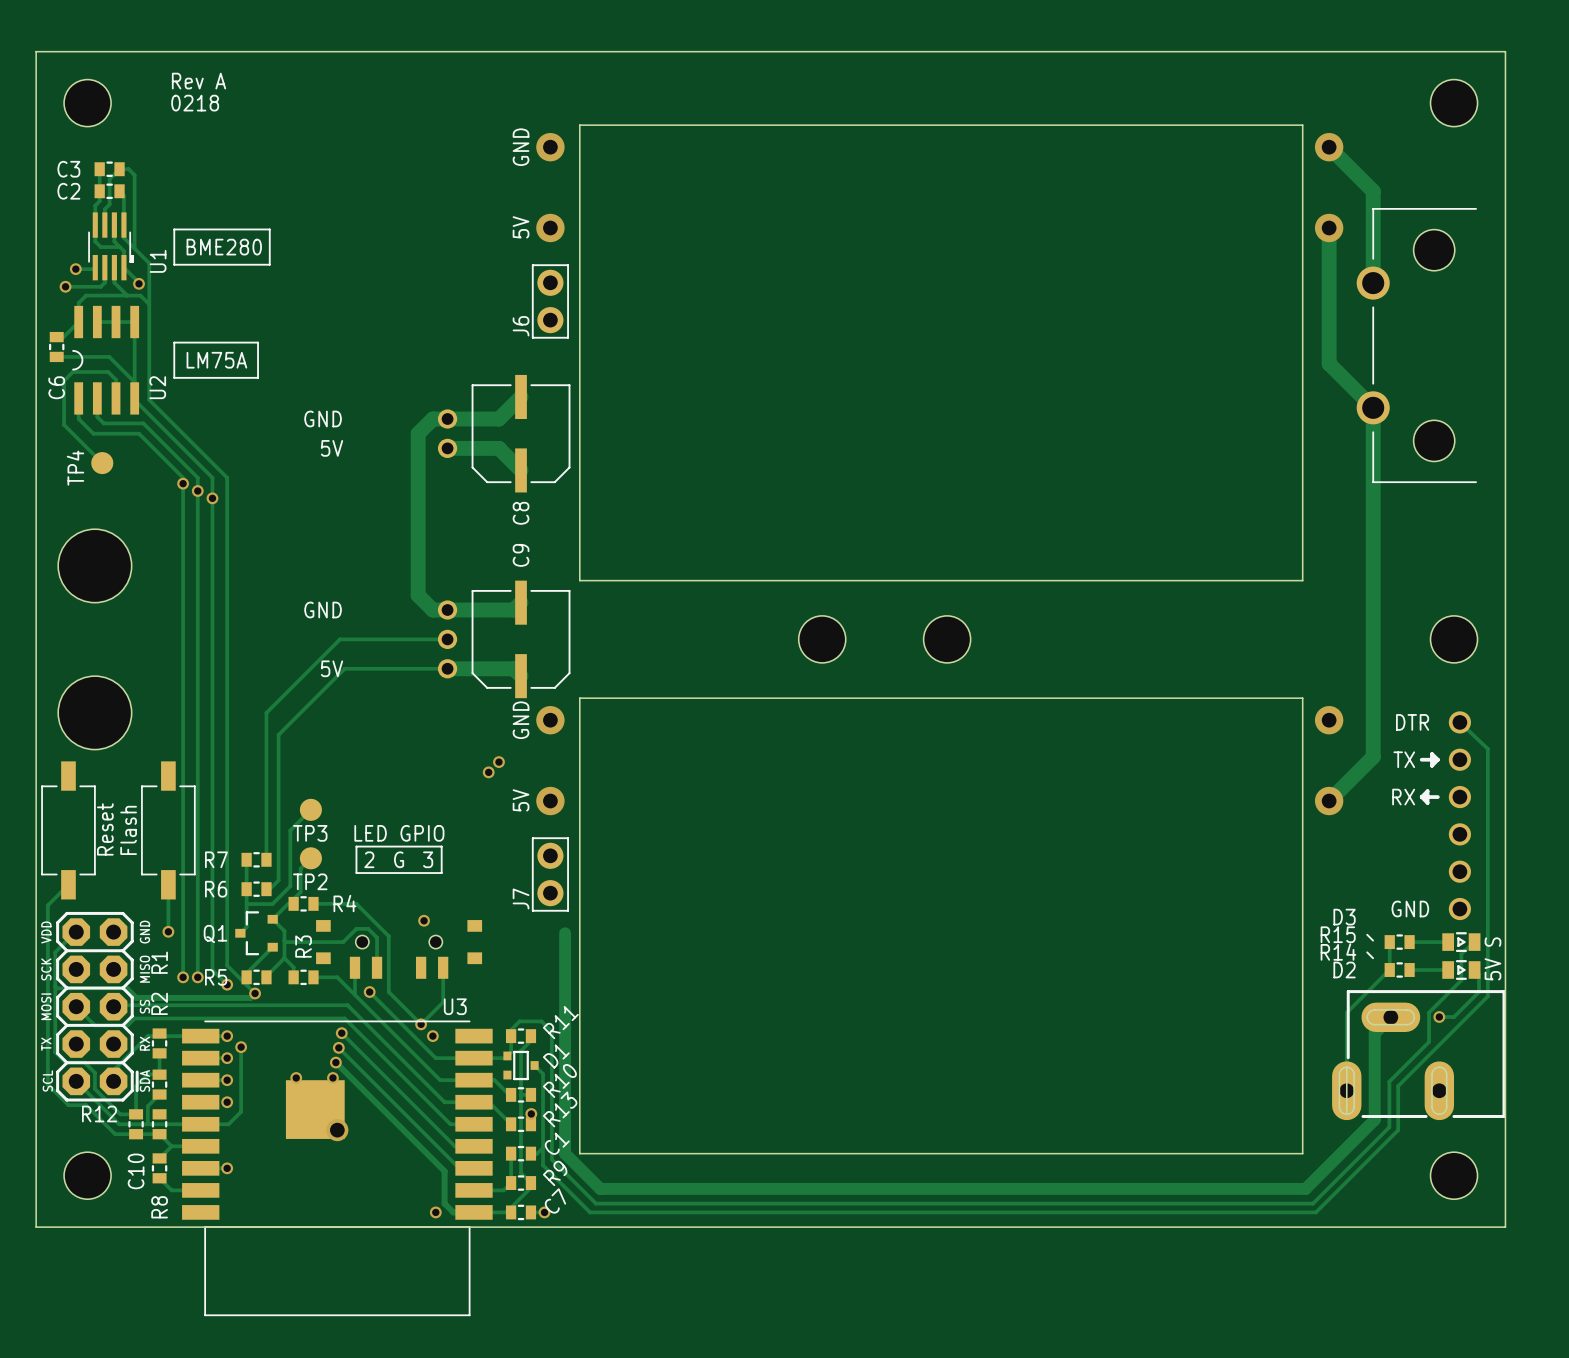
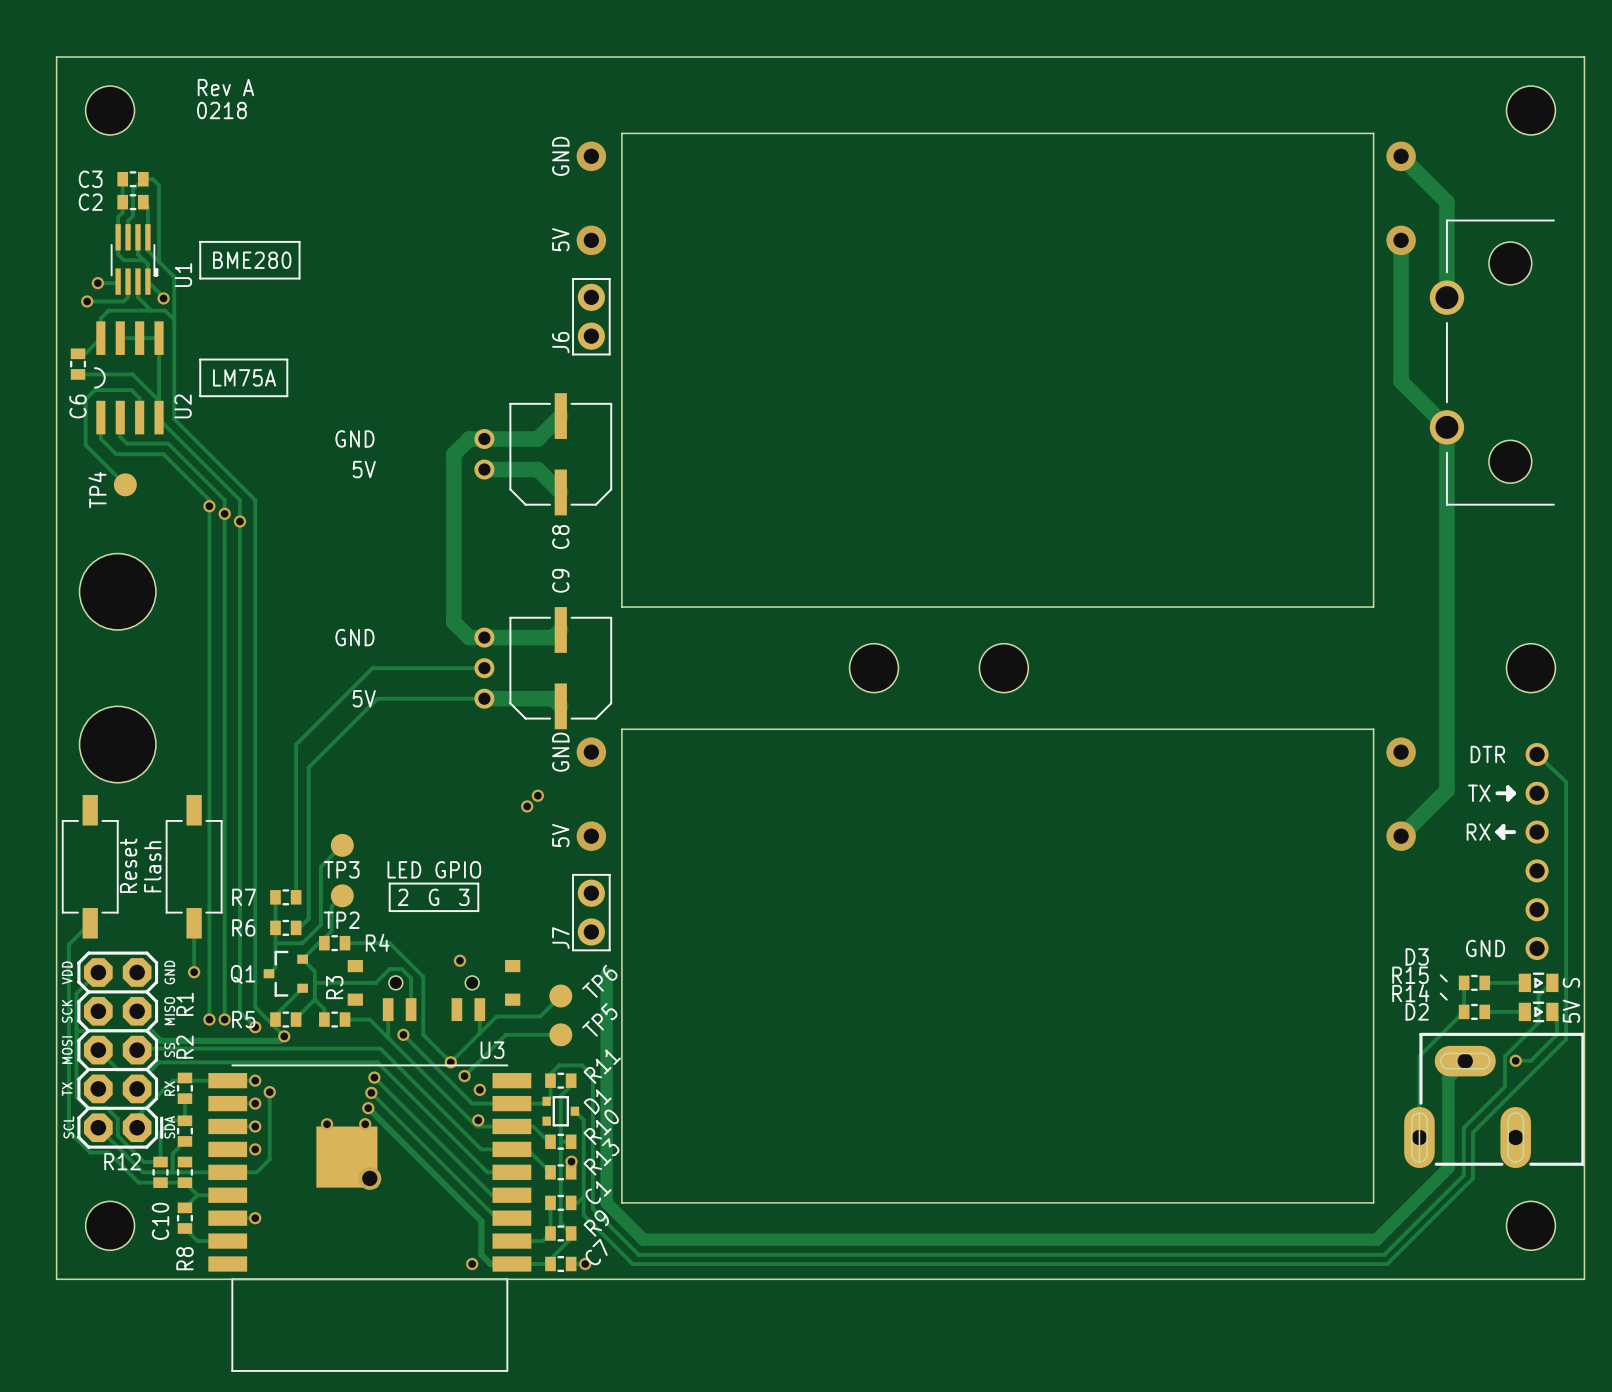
TP6: none -> (560, 996)
track: (443, 990) (443, 1002) (421, 1024) (415, 1018) -> (560, 996) (540, 1016) (496, 1016) (450, 1062)
track: none -> (560, 1034) (505, 1034) (464, 1076)
TP5: none -> (560, 1034)
via: none -> (450, 1062)
via: (421, 1024) -> none
via: none -> (464, 1076)
via: (432, 1036) -> none
via: none -> (479, 1089)
via: none -> (478, 1120)

